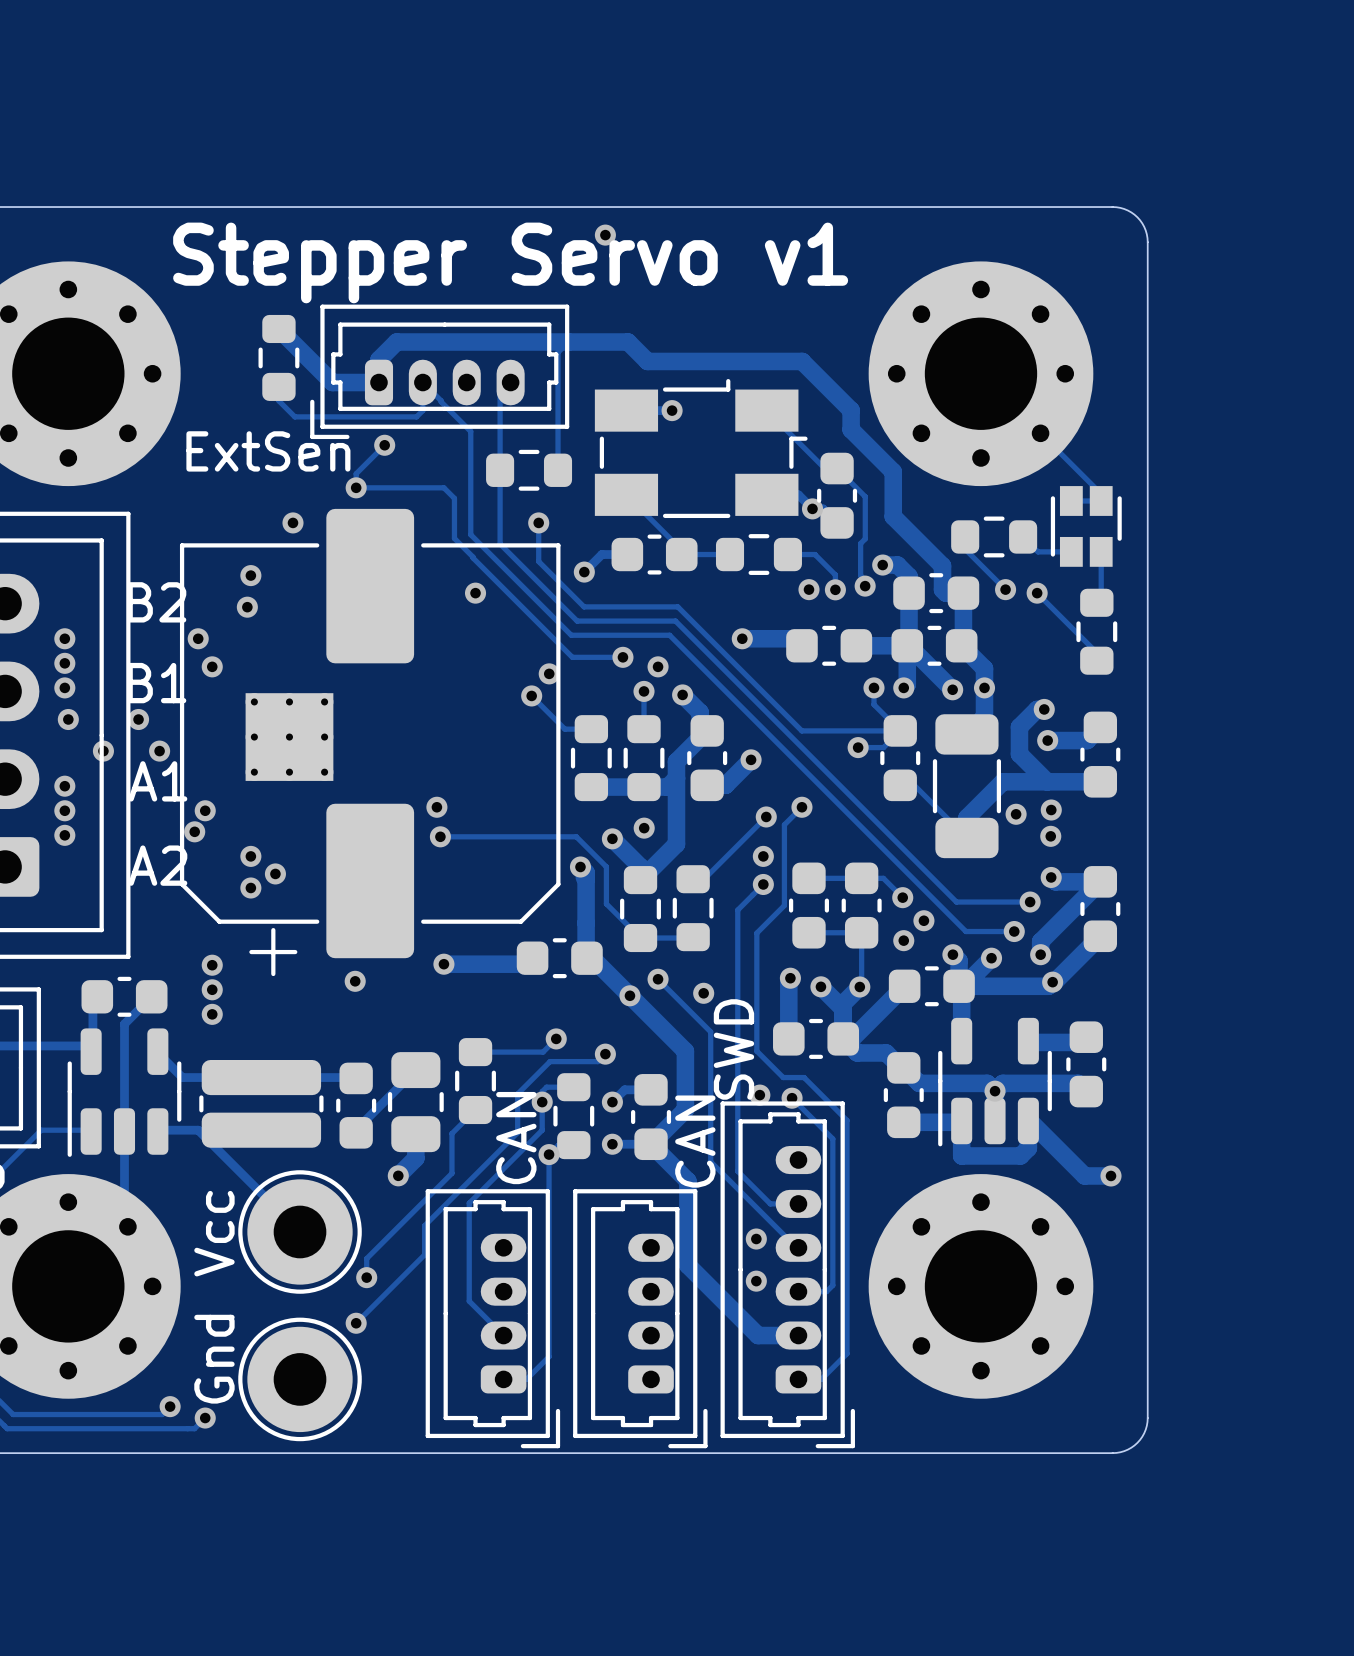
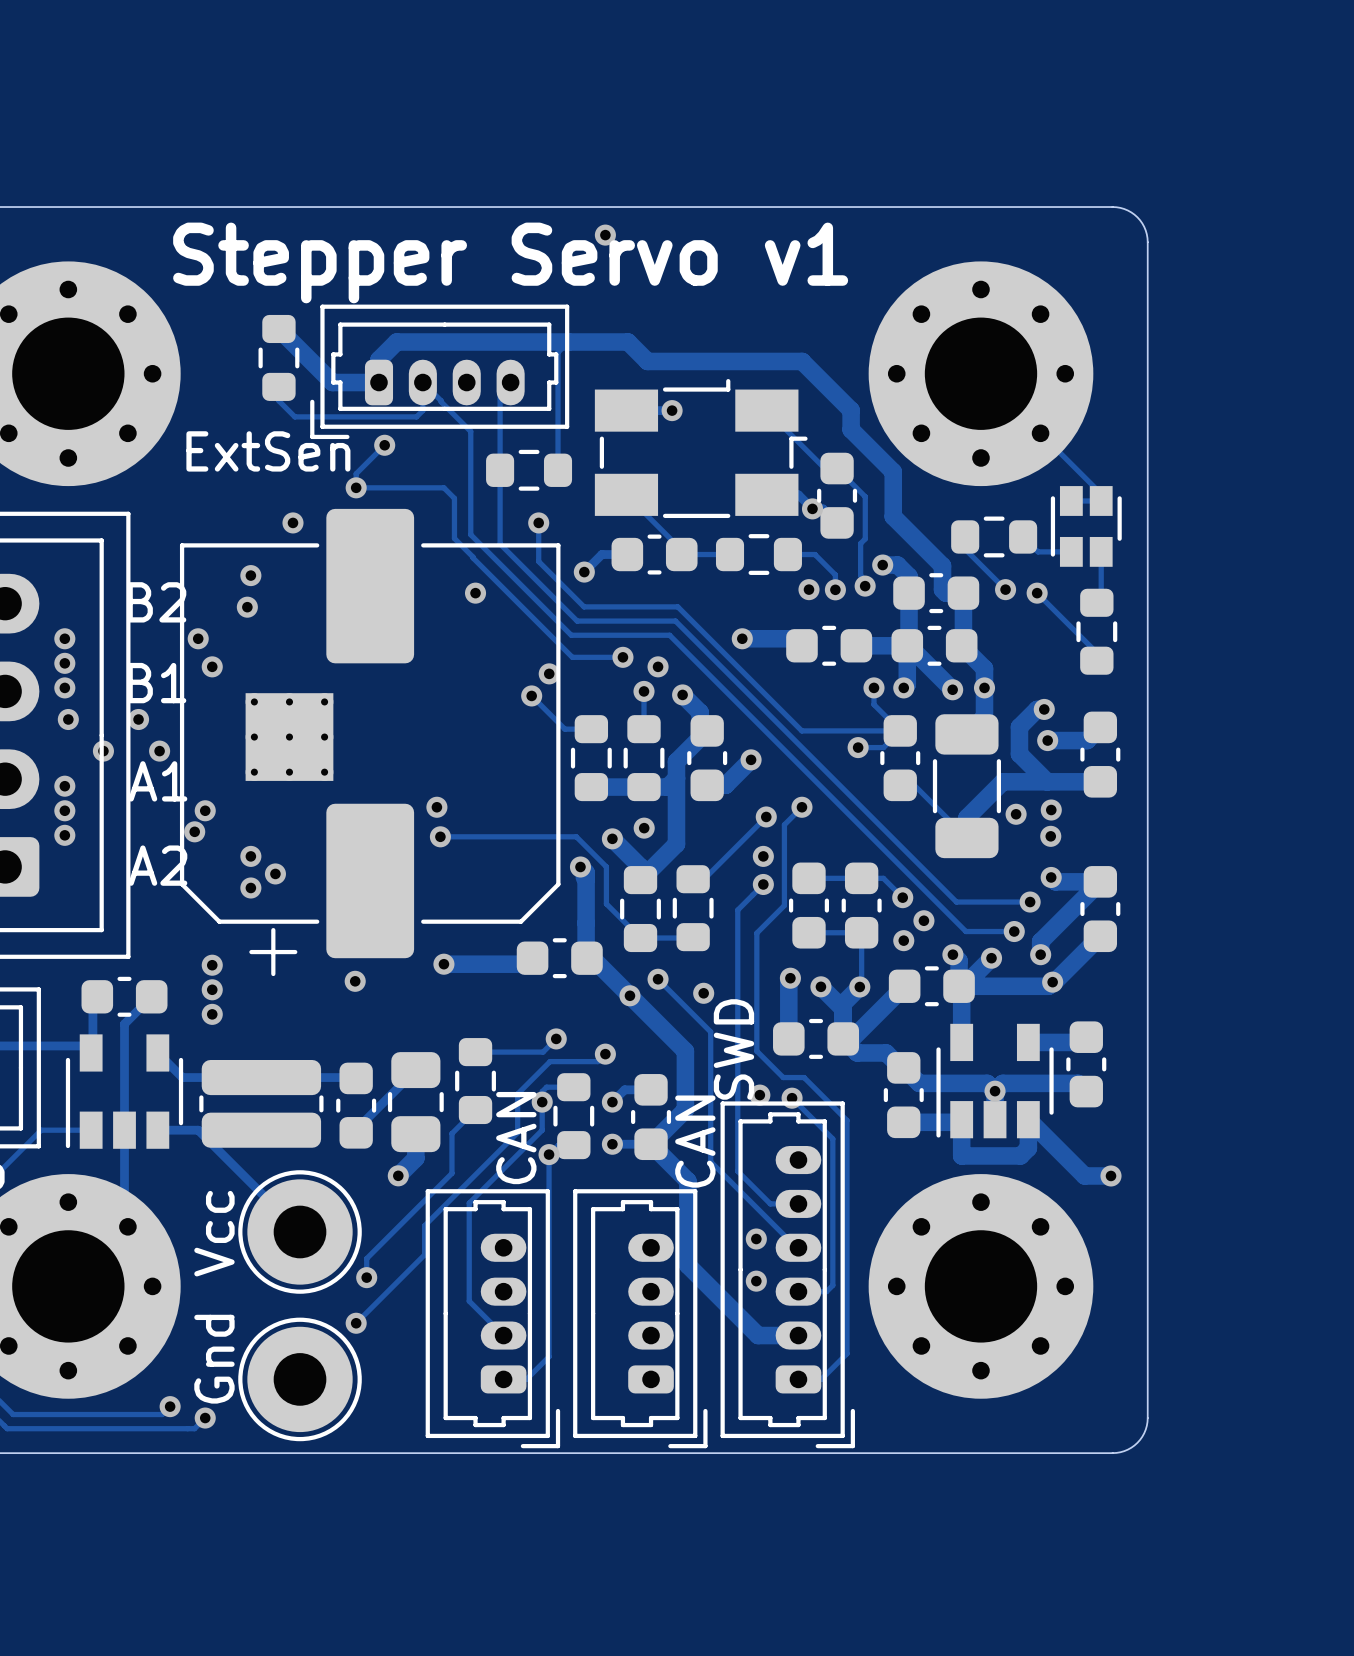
part footprint: [938, 1017, 1052, 1147] -> [936, 1023, 1054, 1139]
part footprint: [67, 1028, 182, 1157] -> [65, 1034, 184, 1149]

